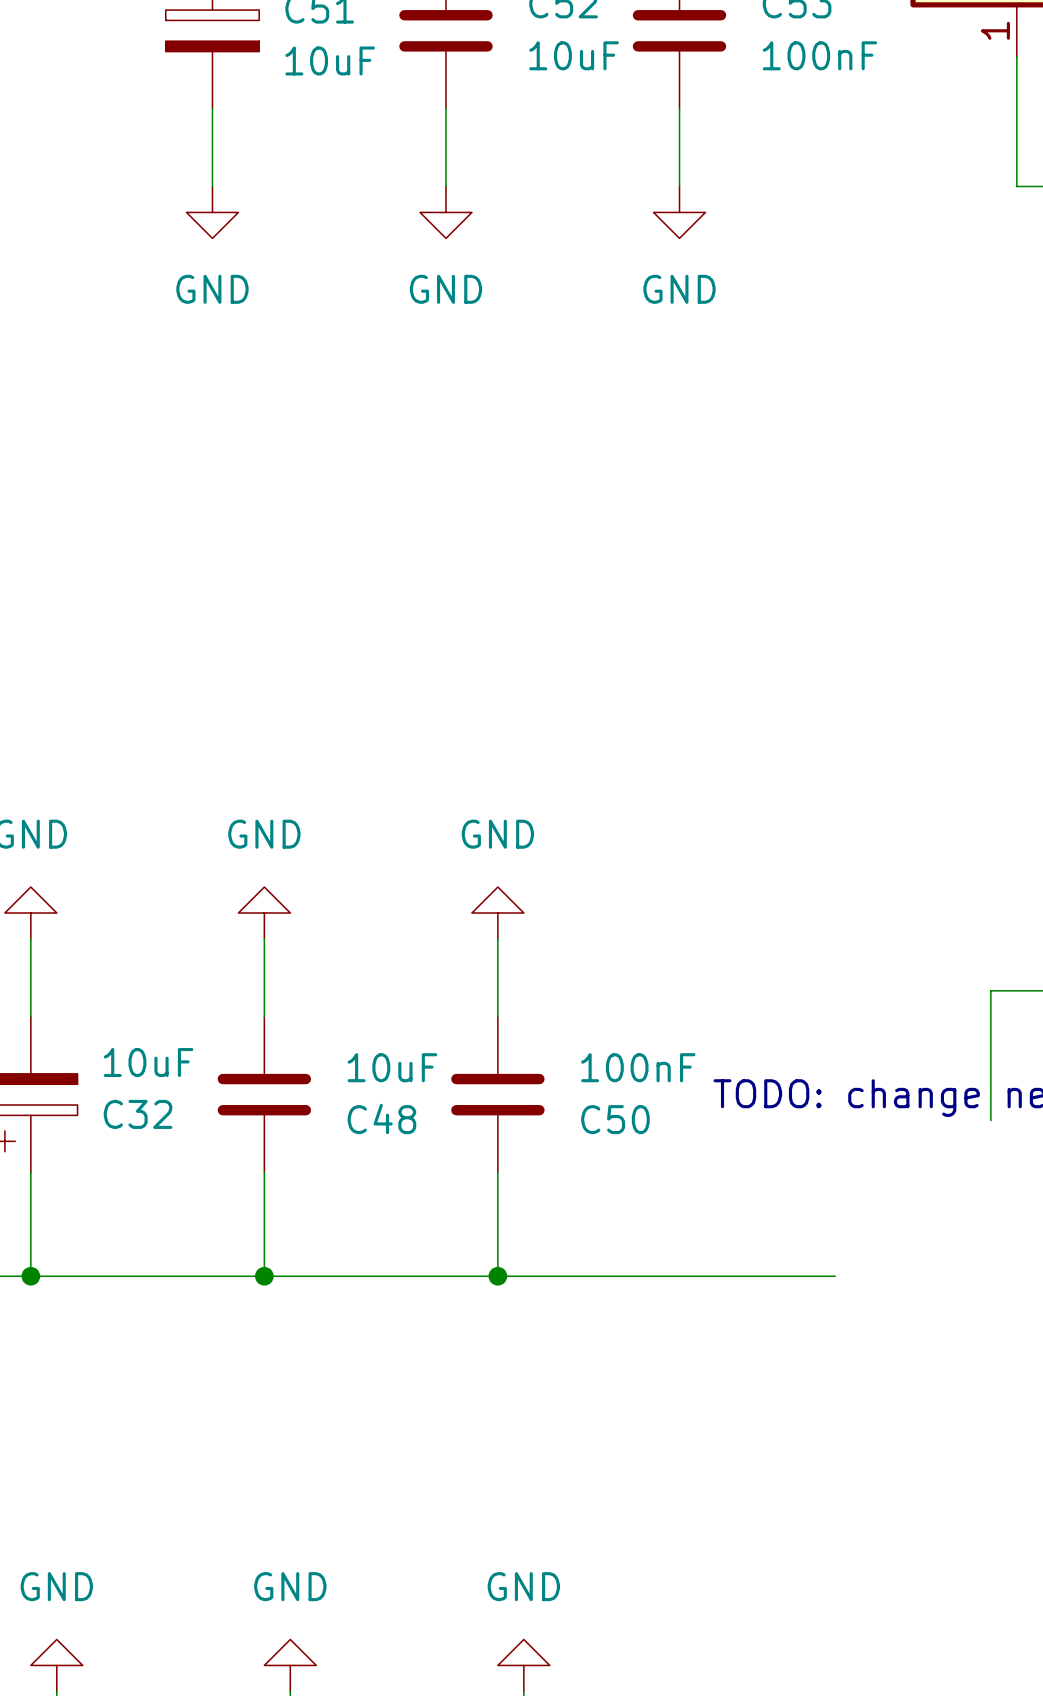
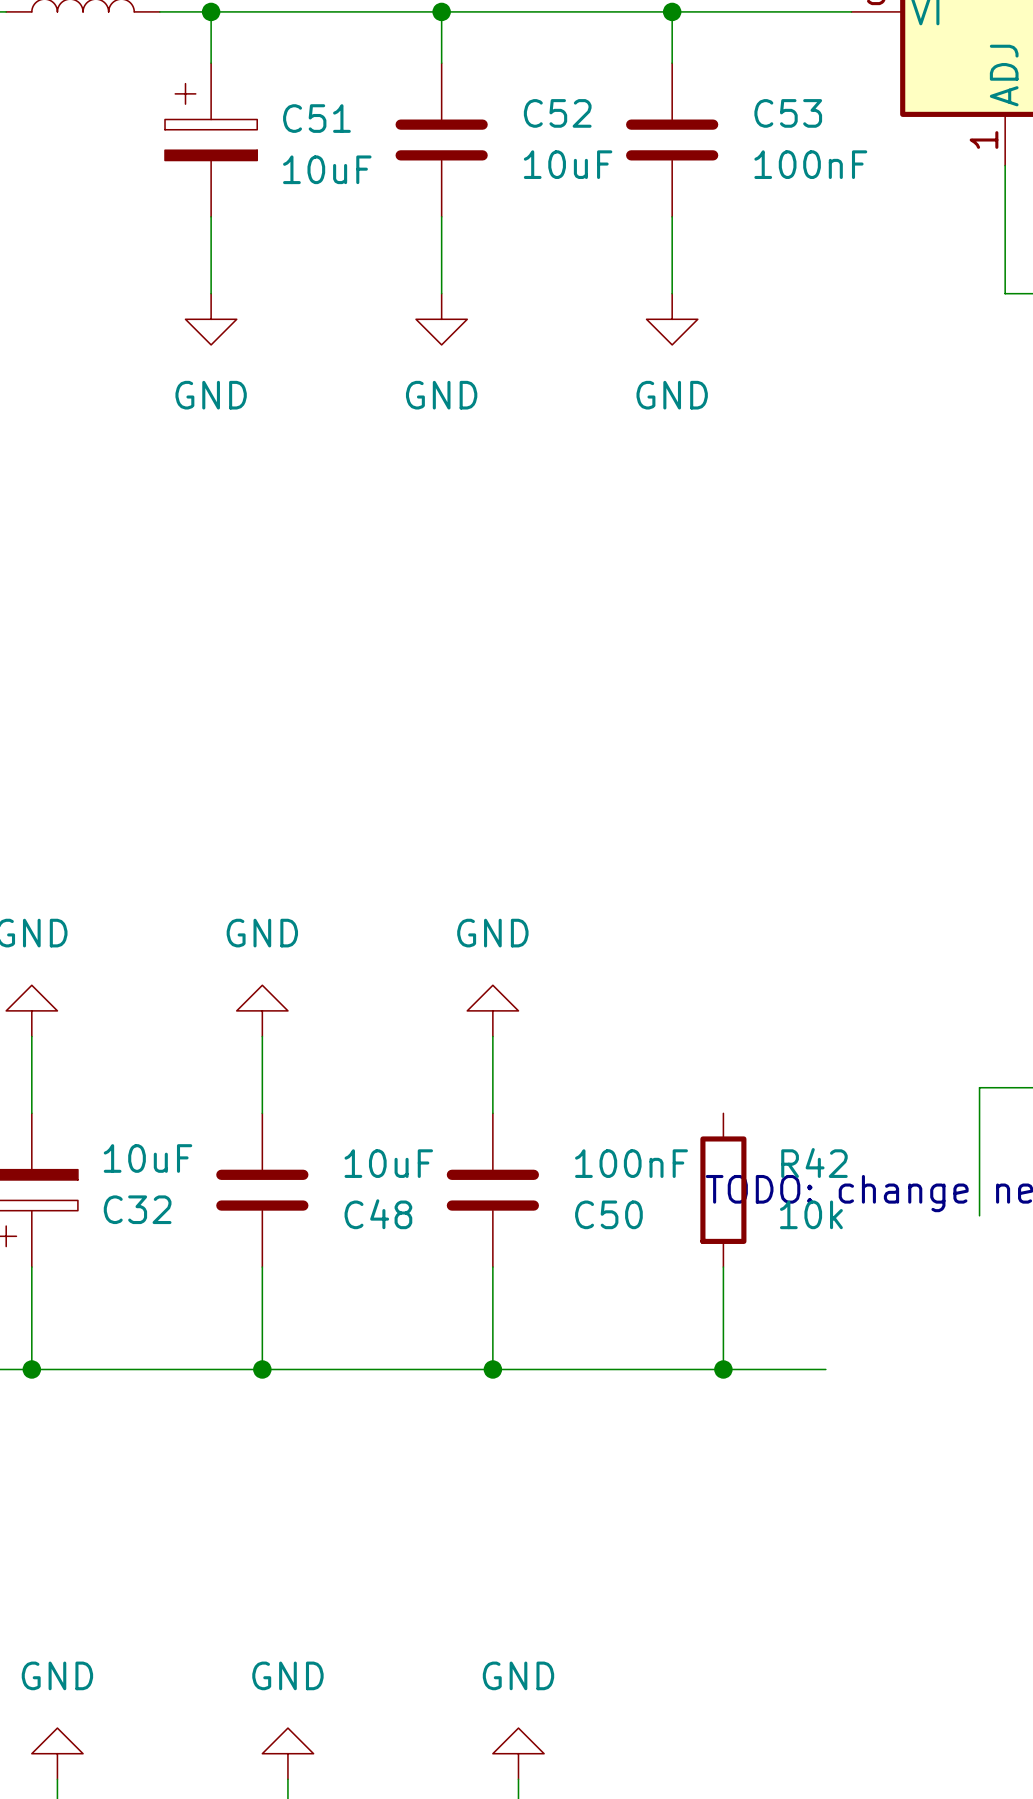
R42: none -> 10k (723, 1190)
wire: none -> (723, 1267) (723, 1369)
junction: none -> (723, 1369)

